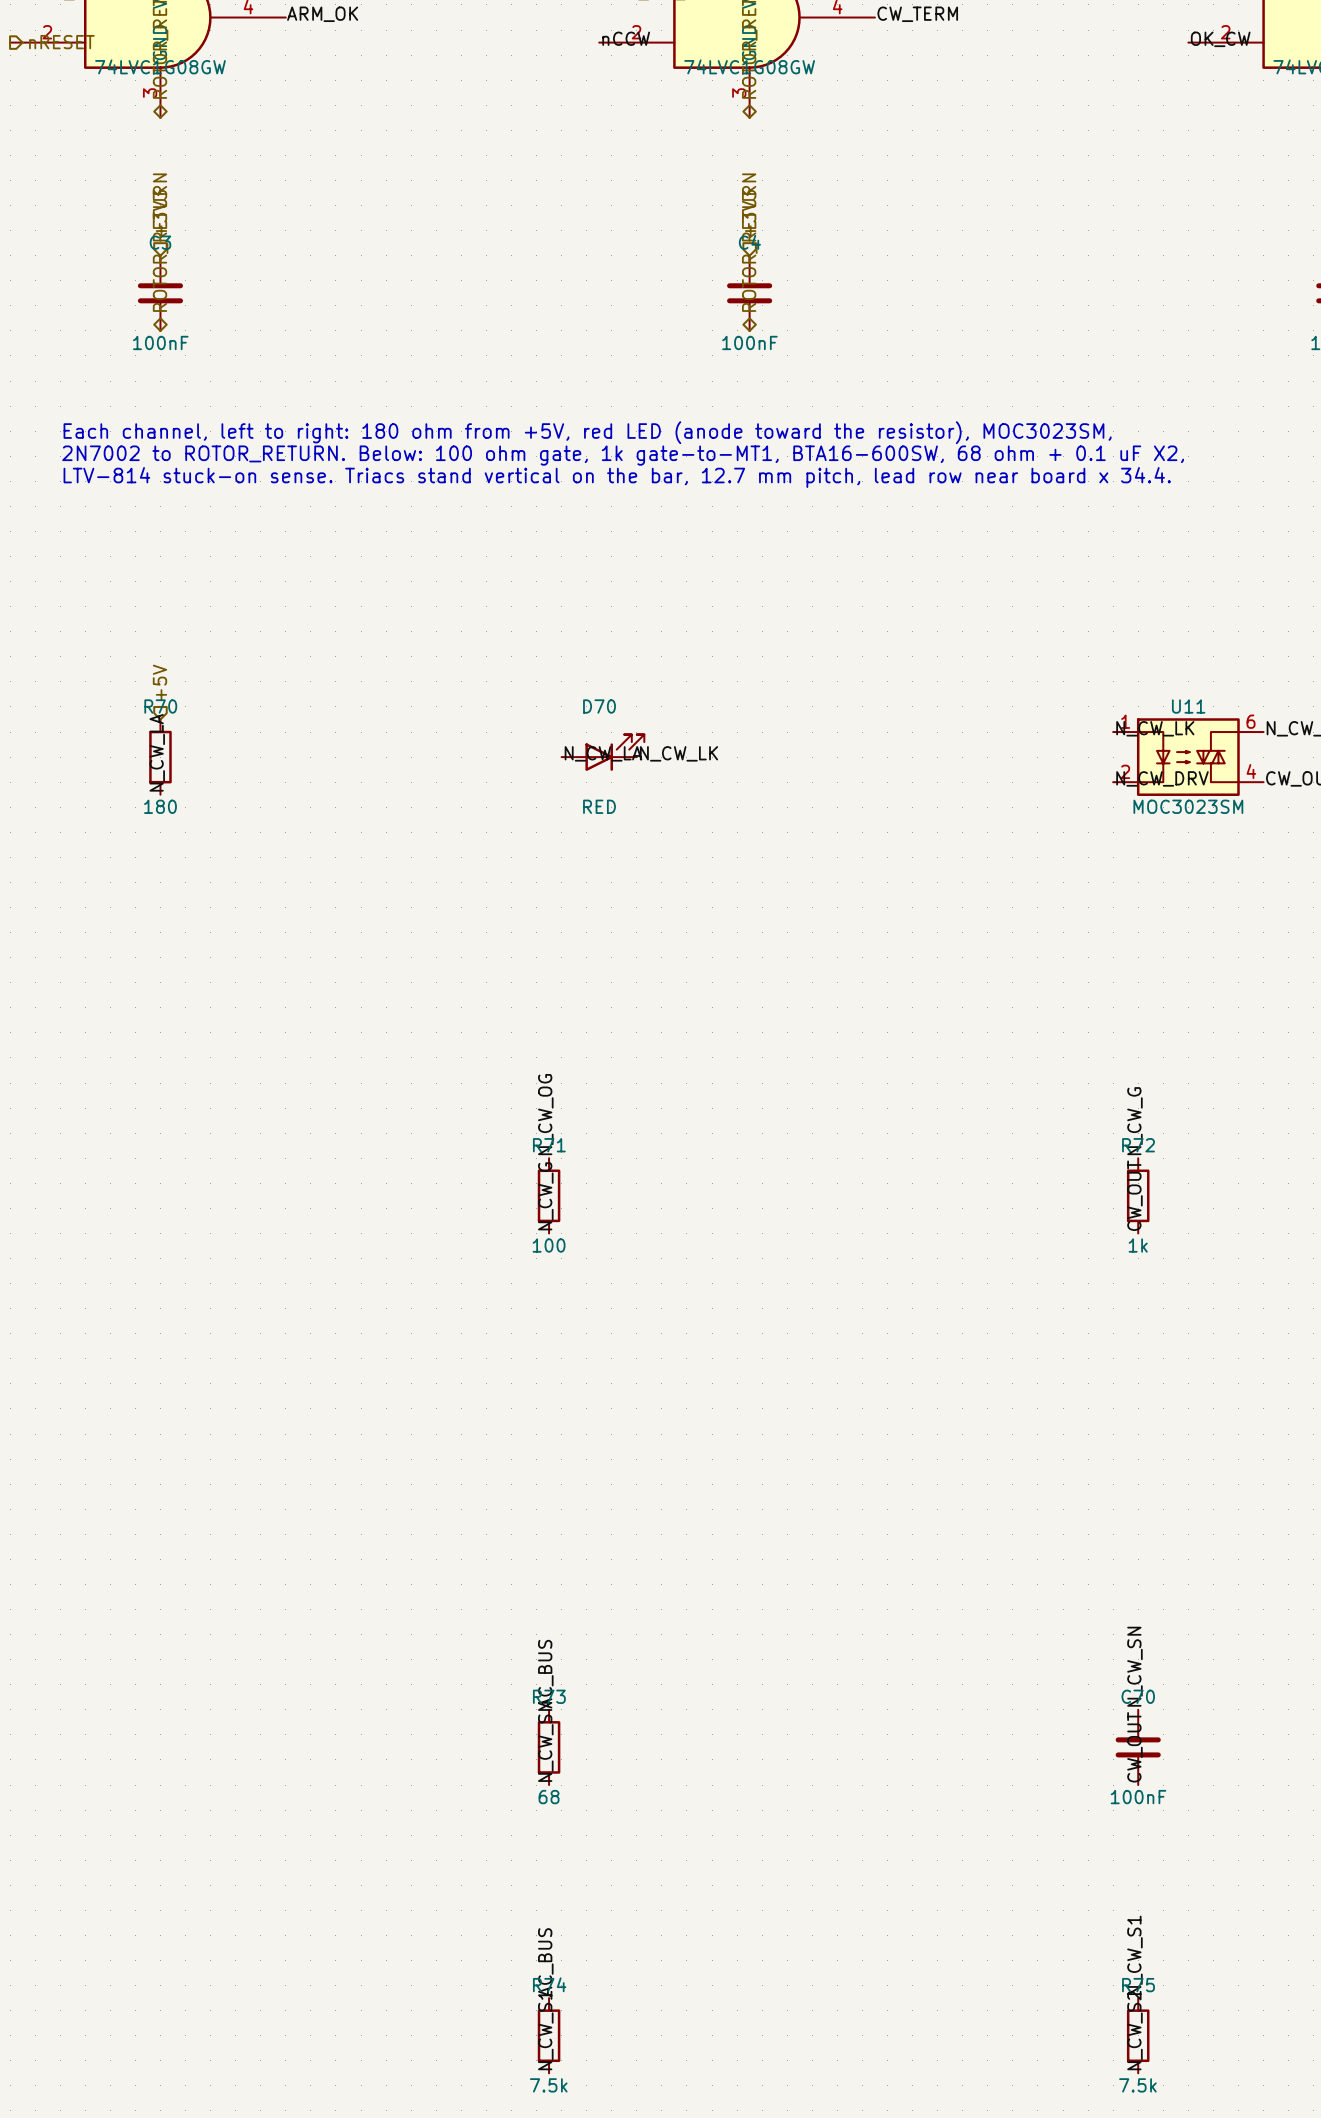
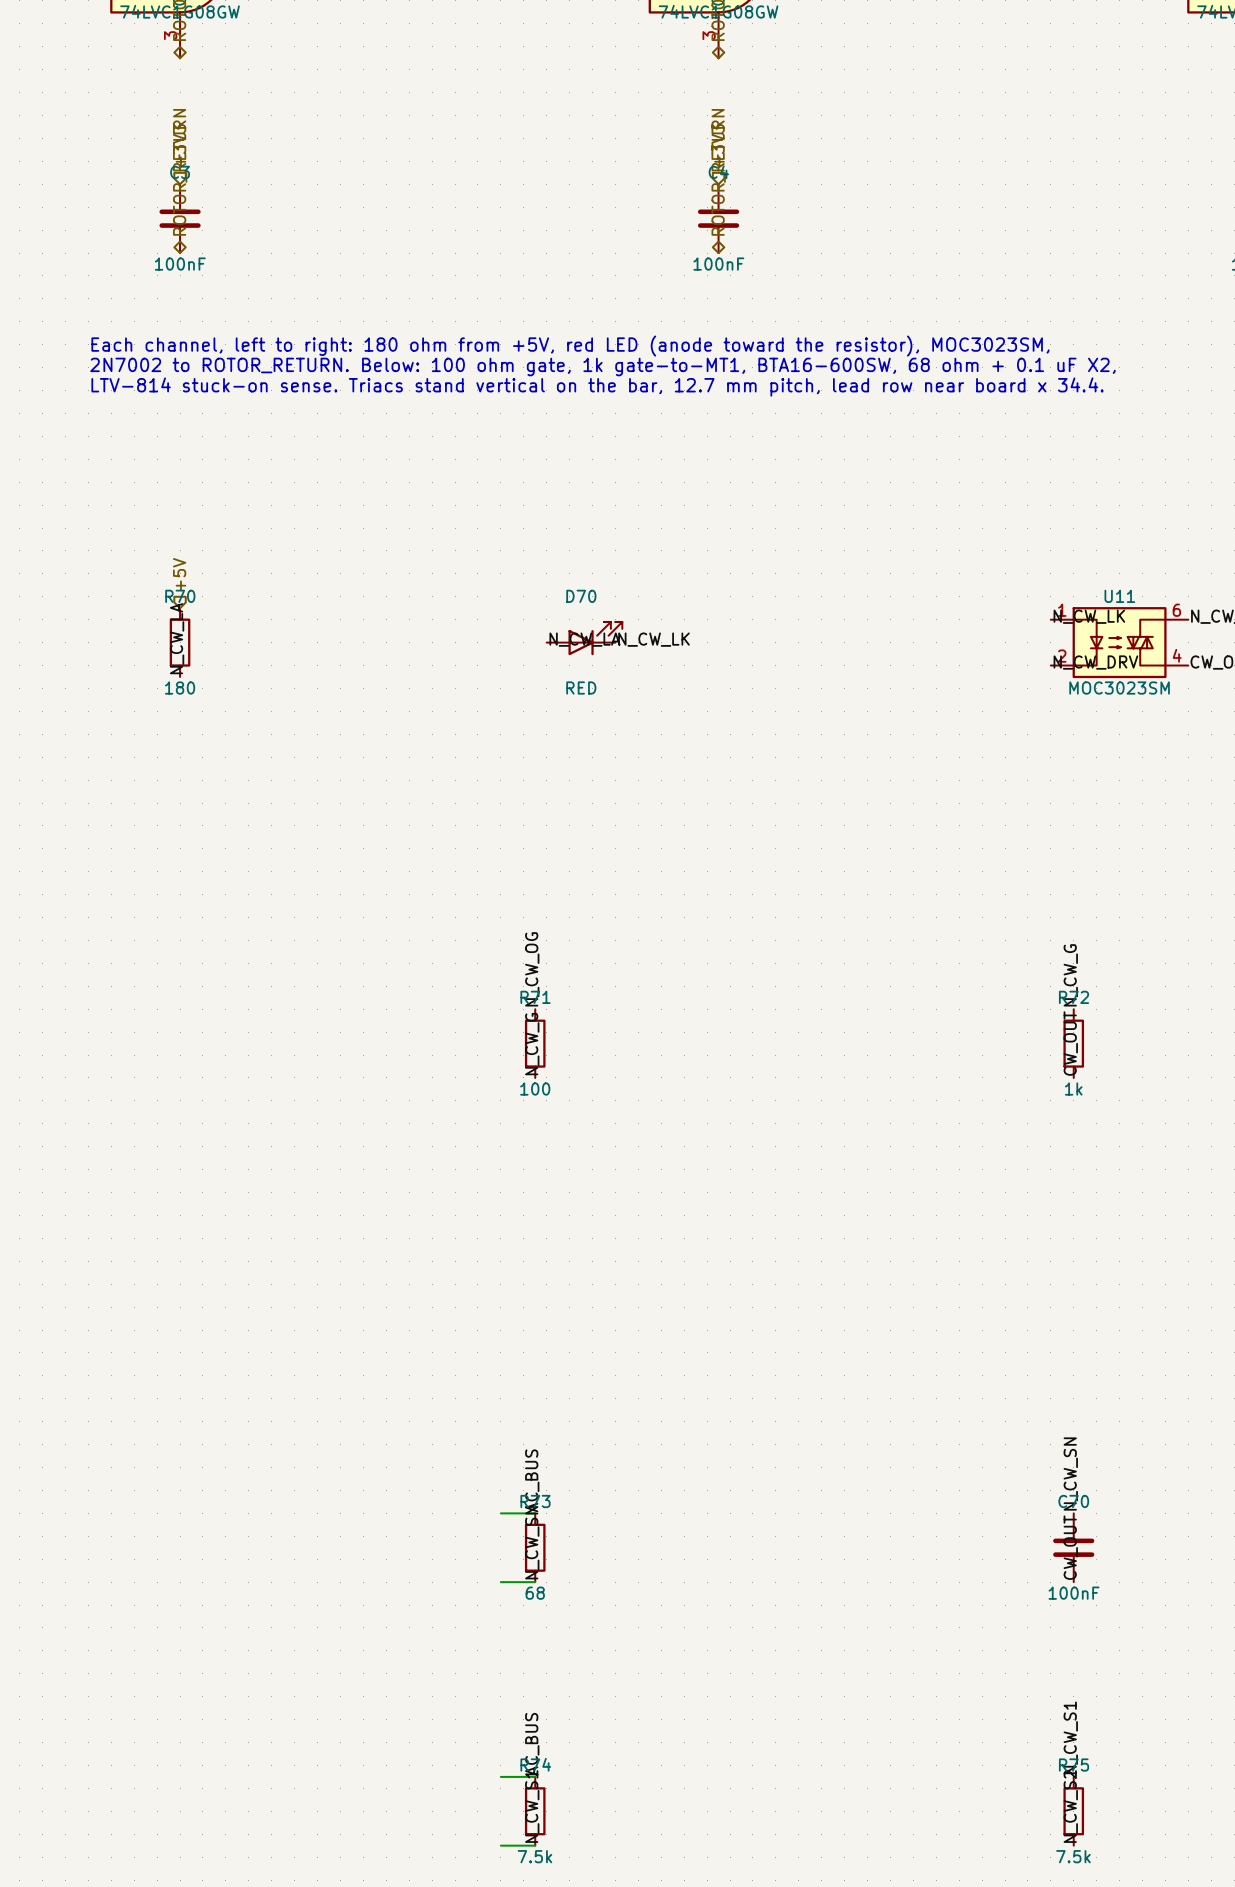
wire: none -> (500, 1513) (535, 1513)
wire: none -> (500, 1582) (535, 1582)
wire: none -> (500, 1776) (535, 1776)
wire: none -> (500, 1845) (535, 1845)

